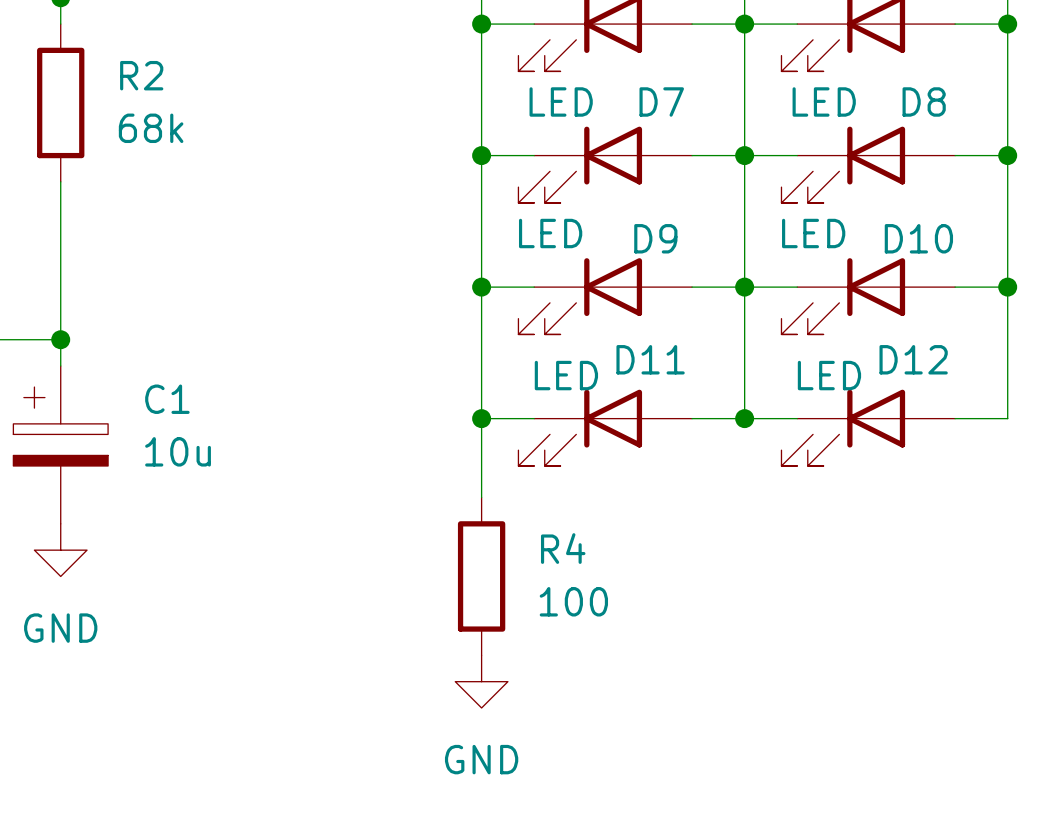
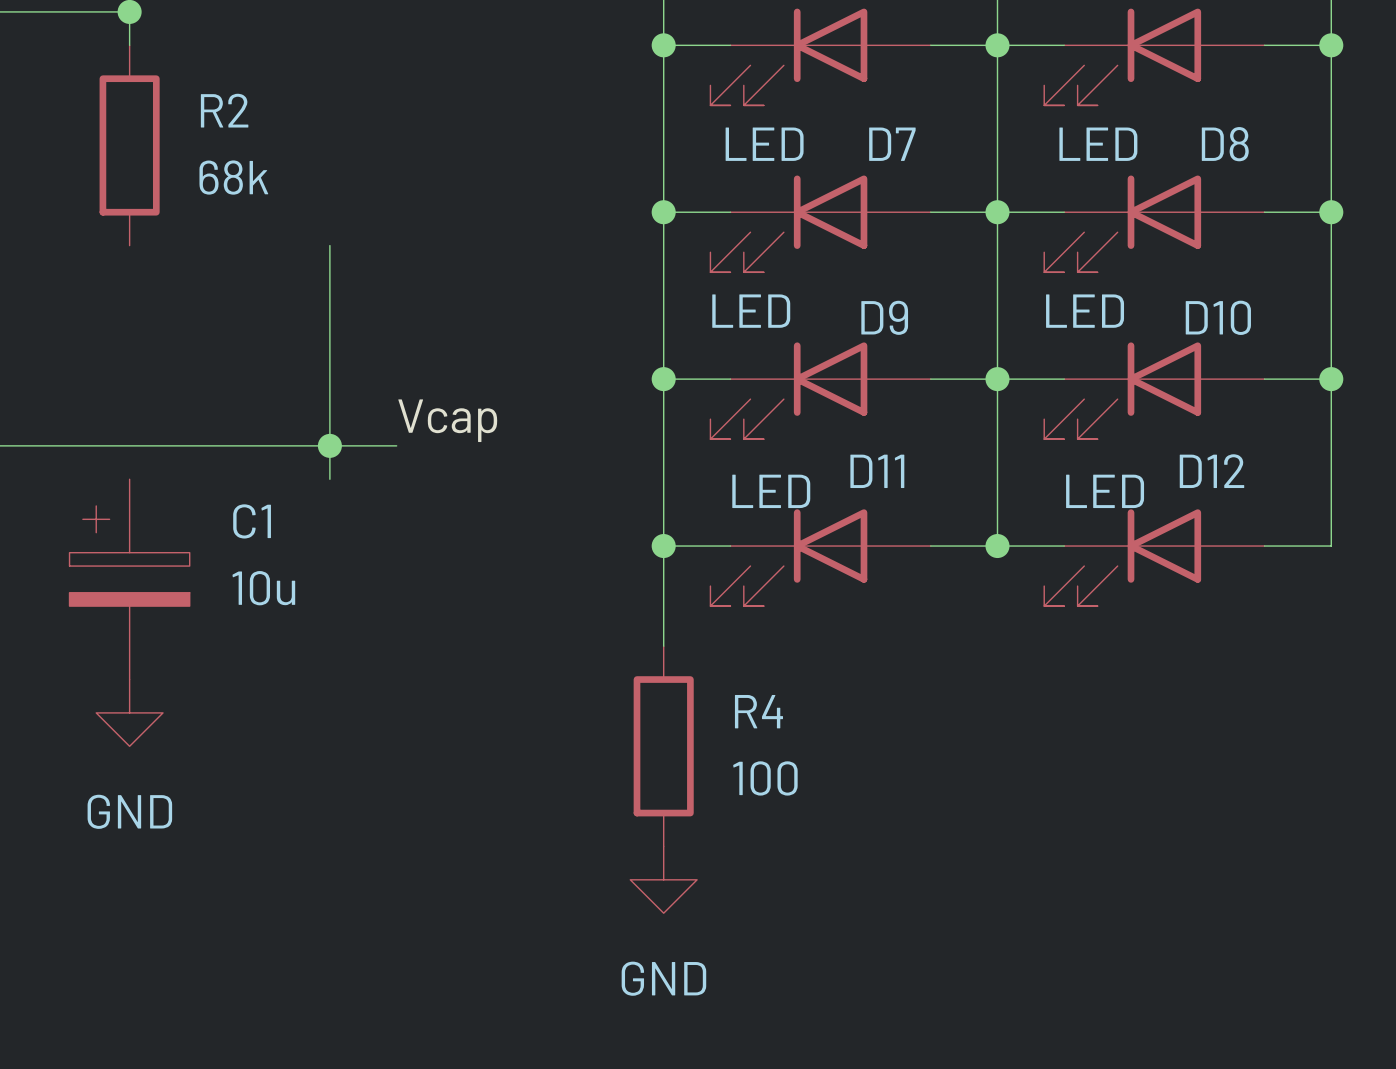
wire: (60, 181) (60, 366) -> (329, 245) (329, 479)
label: none -> Vcap (447, 420)
wire: none -> (129, 445) (396, 445)
junction: (60, 339) -> none
junction: none -> (329, 445)

